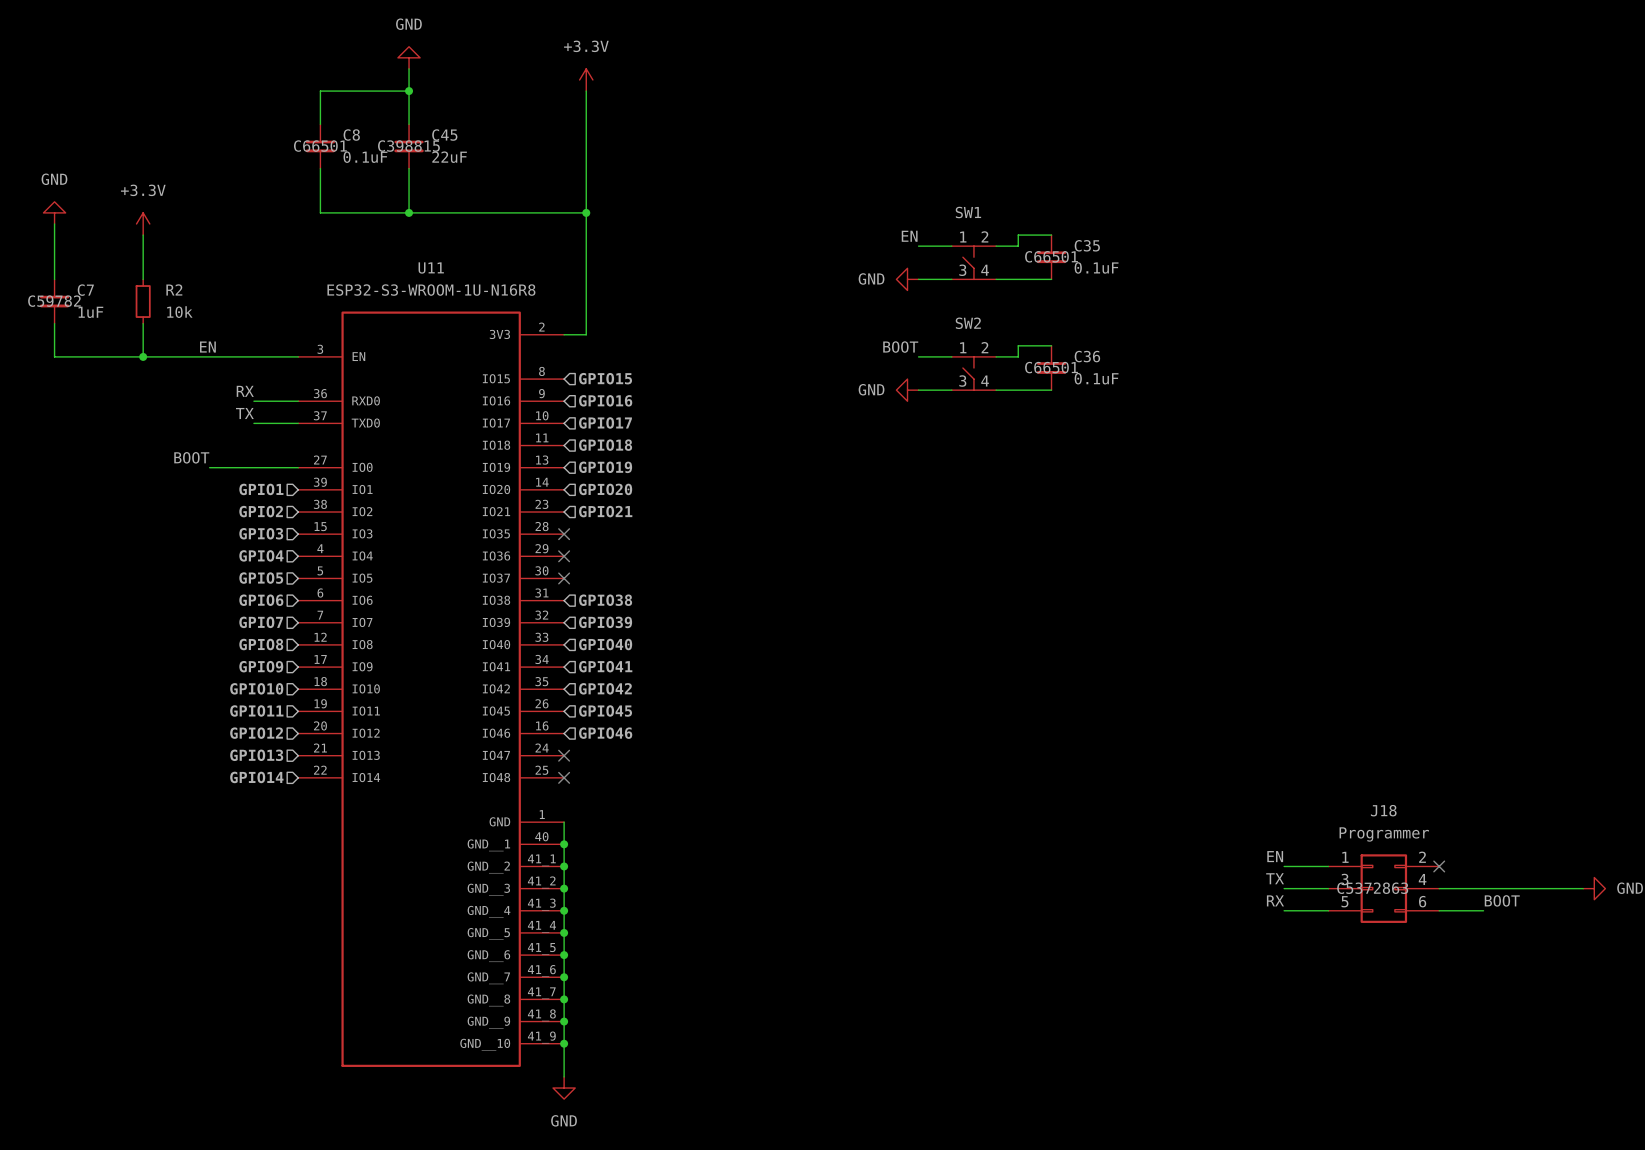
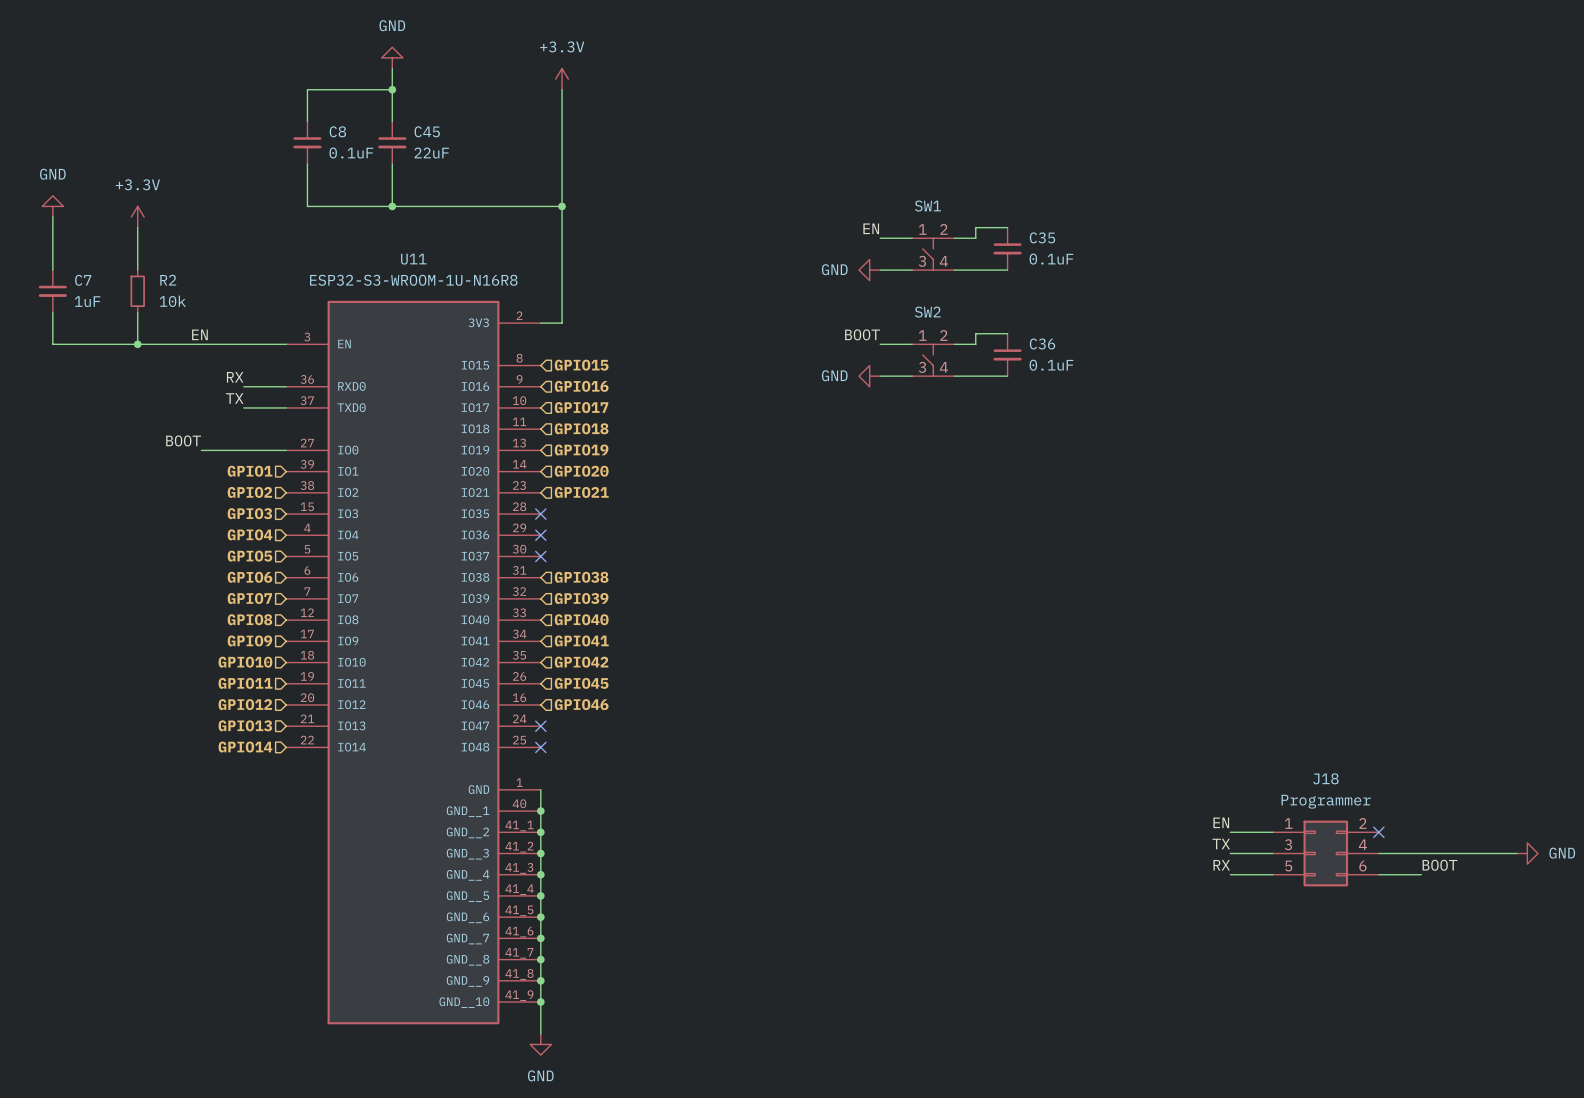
C8 text: C66501 (320, 146) -> none
C45 text: C398815 (408, 146) -> none
C35 text: C66501 (1051, 256) -> none
C7 text: C59782 (54, 301) -> none
C36 text: C66501 (1051, 367) -> none
J18 text: C5372863 (1372, 888) -> none

